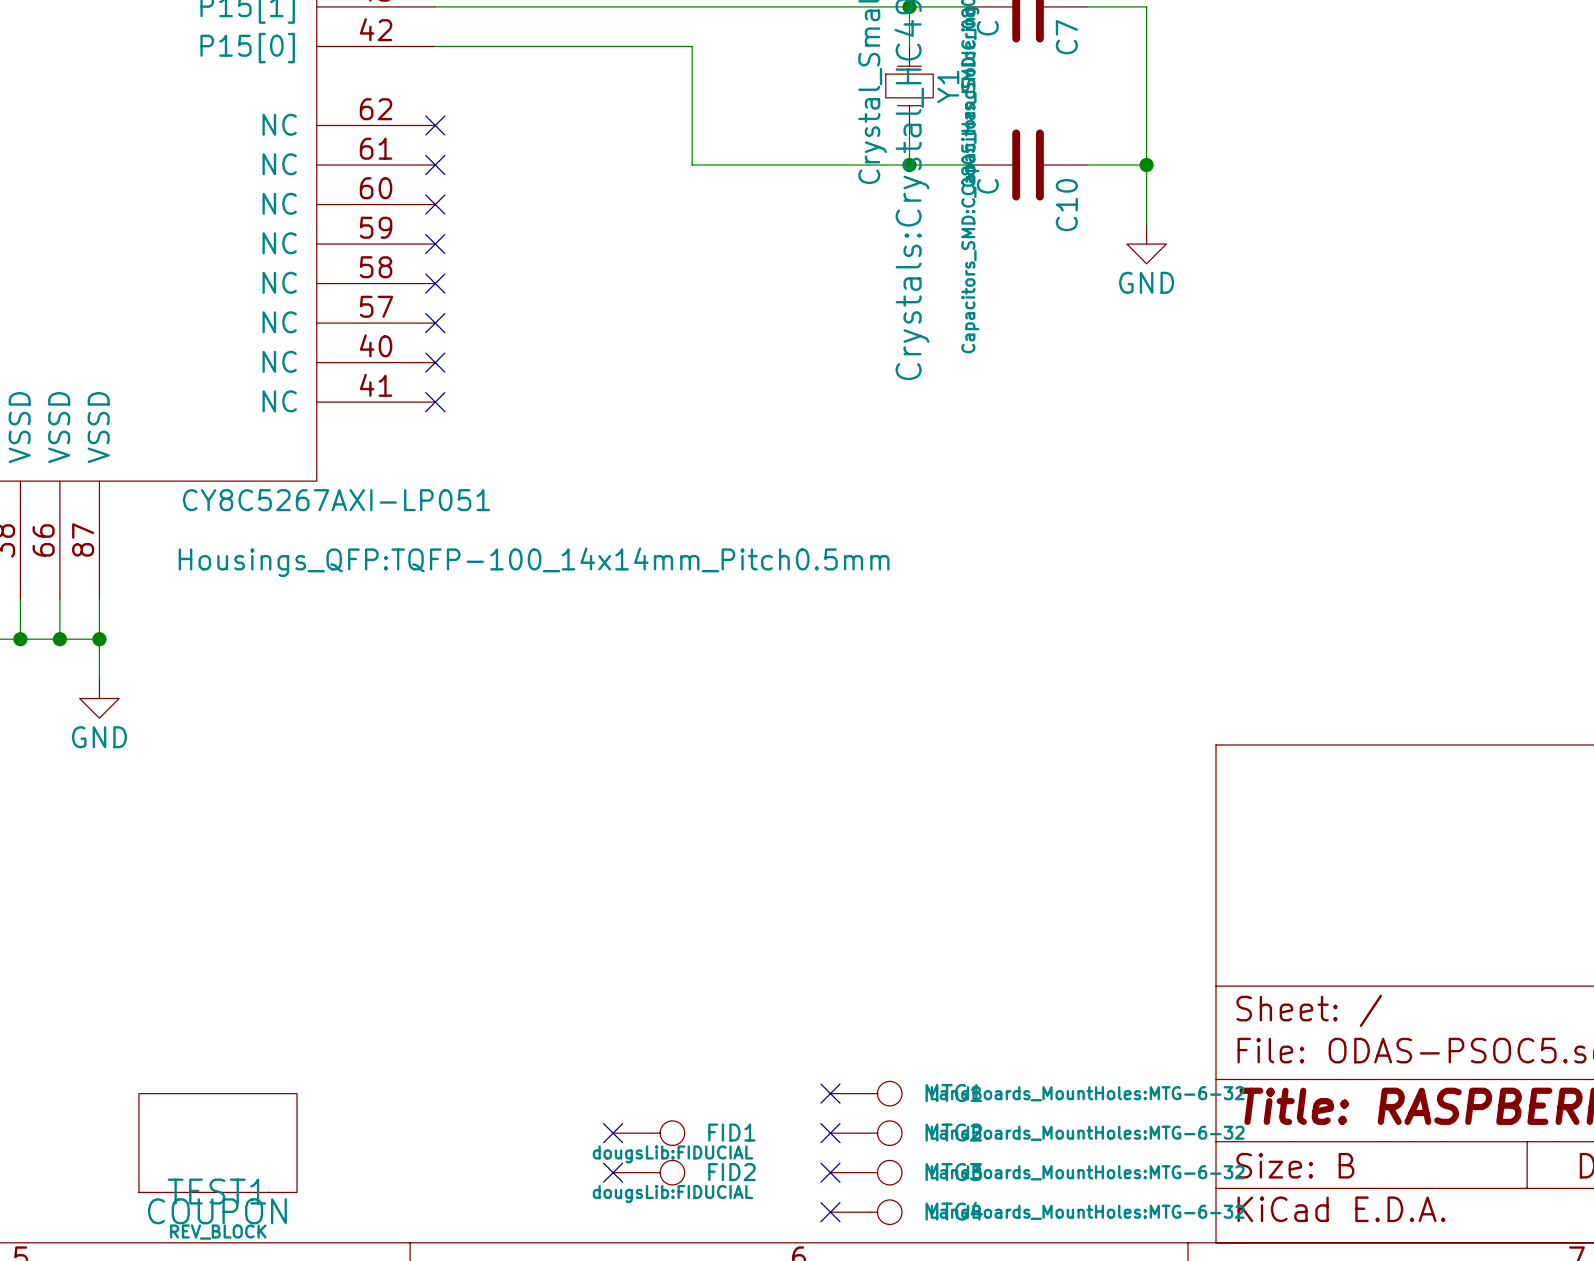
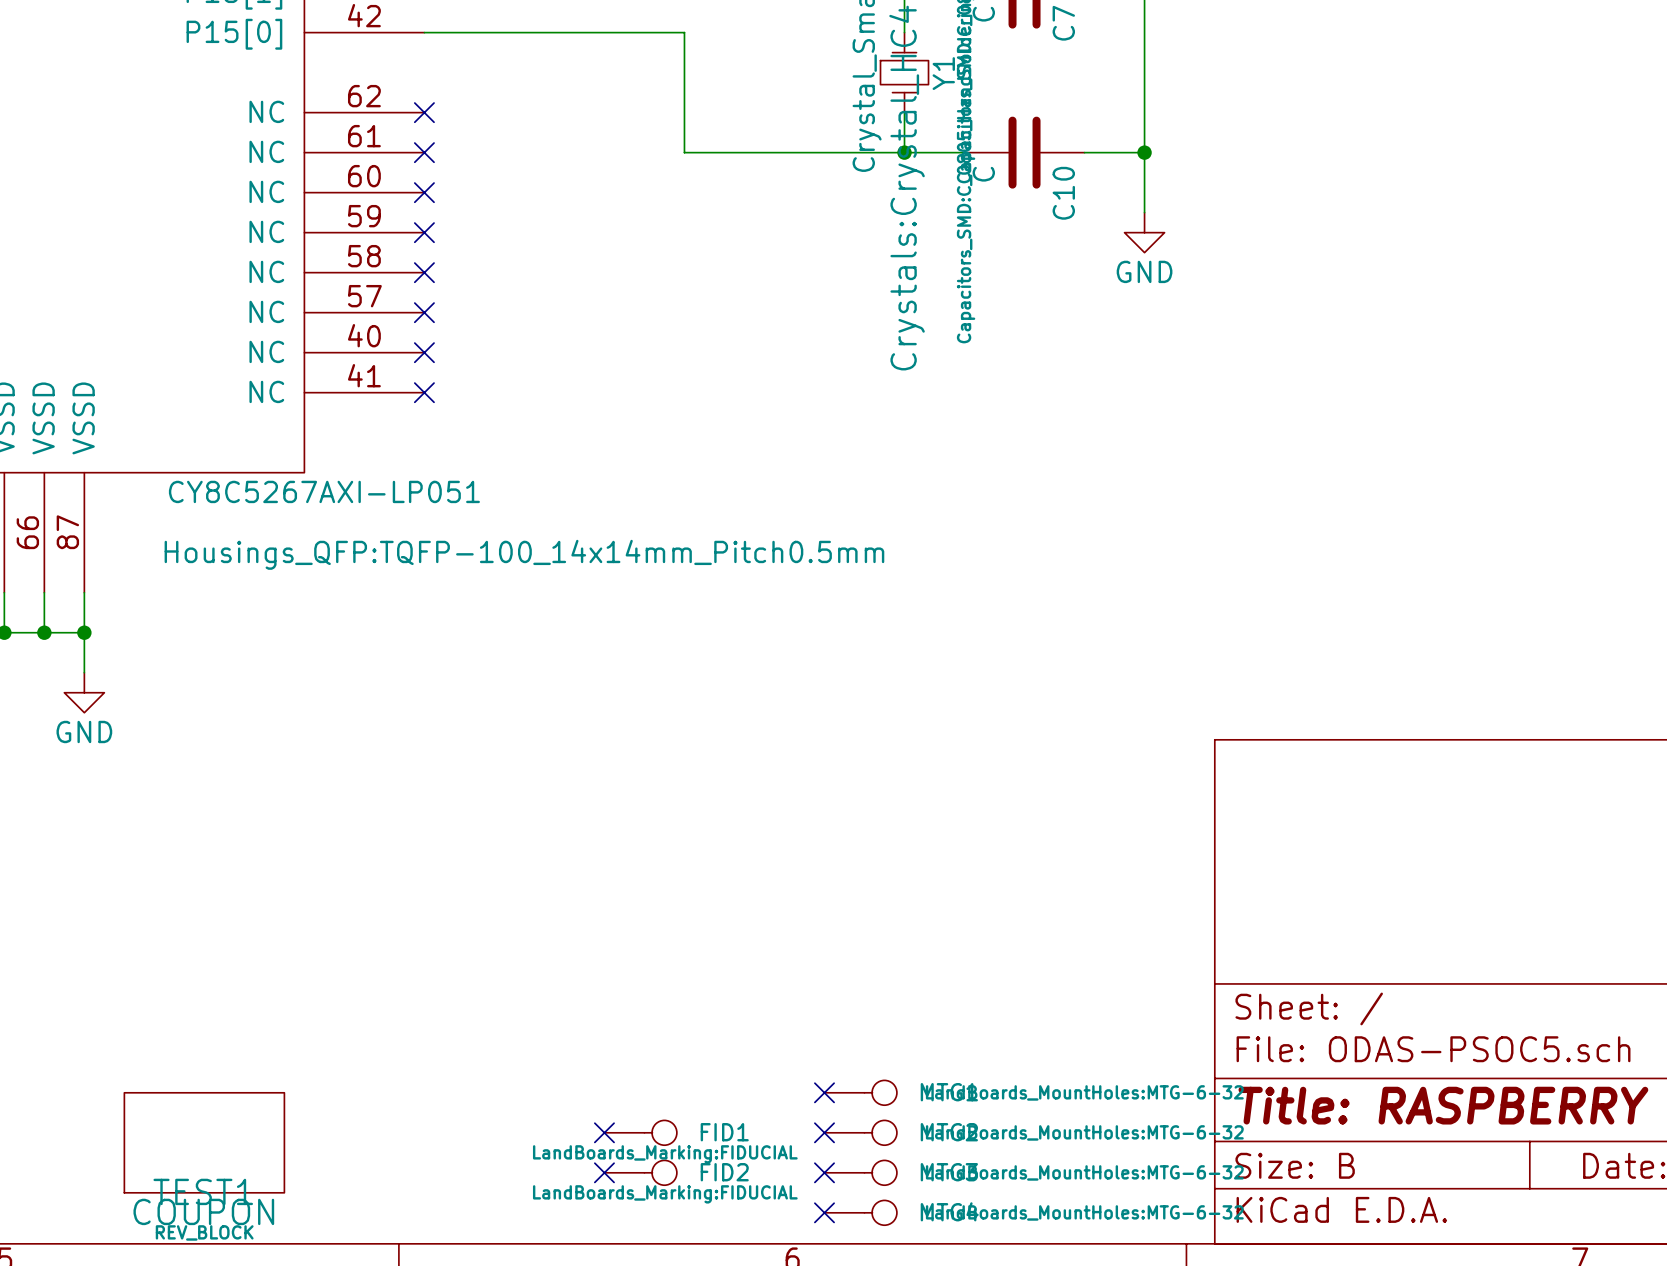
FID1 text: dougsLib:FIDUCIAL (672, 1154) -> LandBoards_Marking:FIDUCIAL (665, 1154)
FID2 text: dougsLib:FIDUCIAL (672, 1193) -> LandBoards_Marking:FIDUCIAL (665, 1194)

